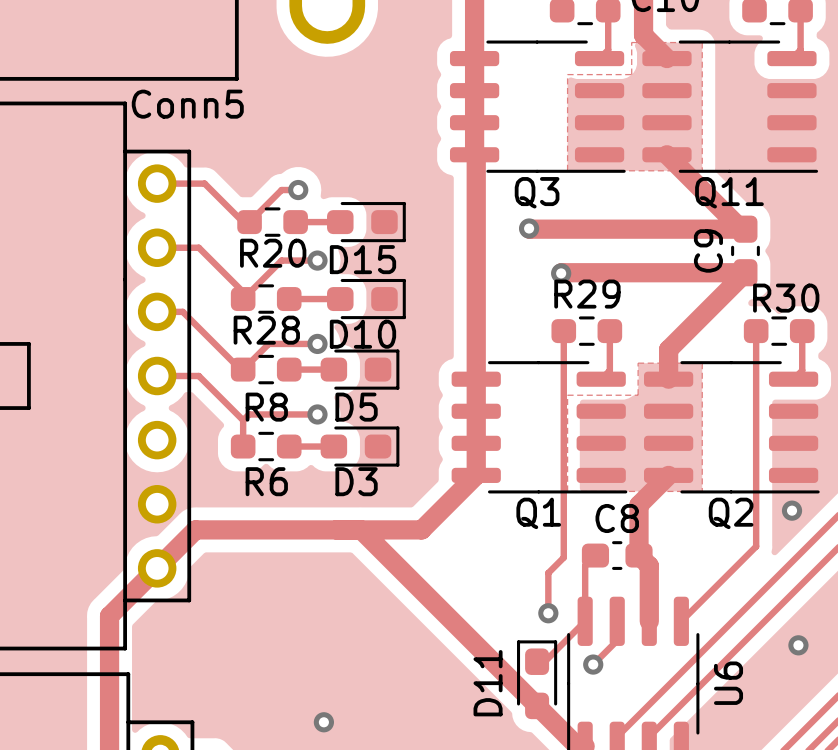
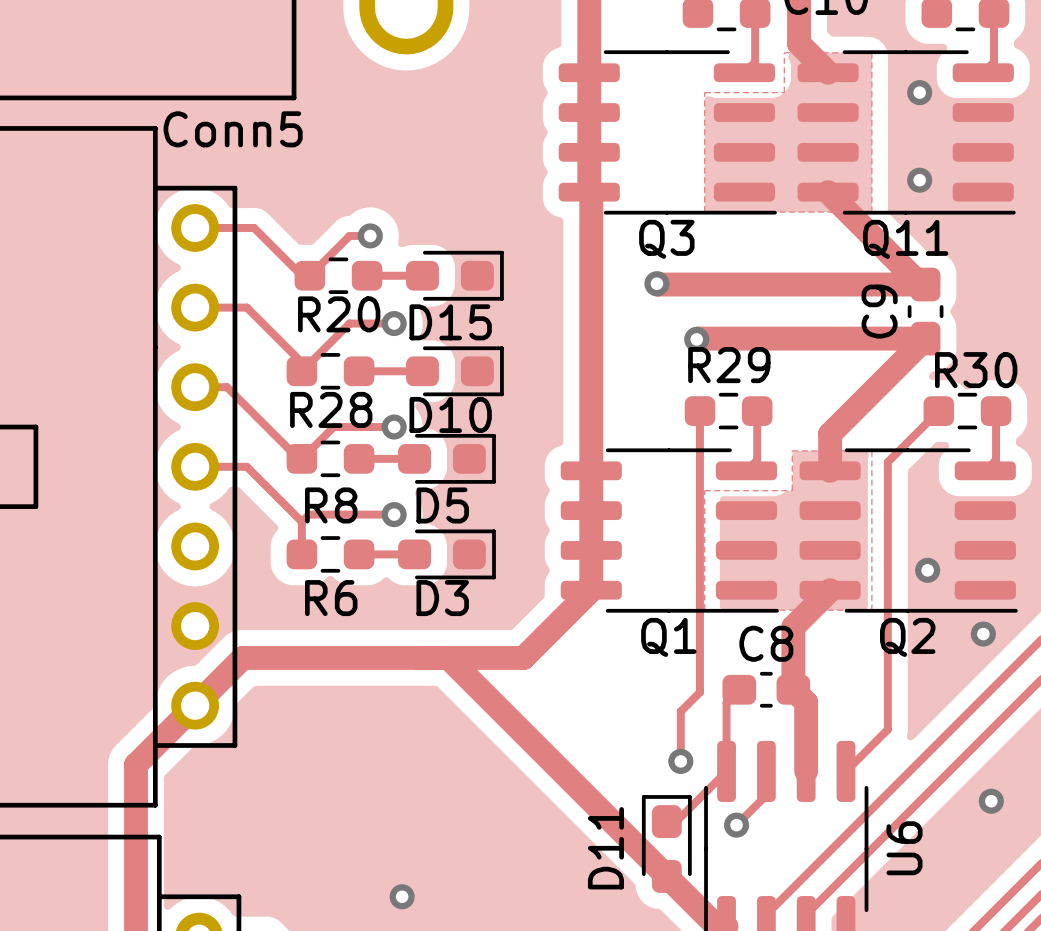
via: none -> (919, 92)
via: none -> (919, 180)
track: (756, 331) (756, 546) (715, 587) -> (938, 411) (887, 462) (887, 729)
via: none -> (927, 570)

